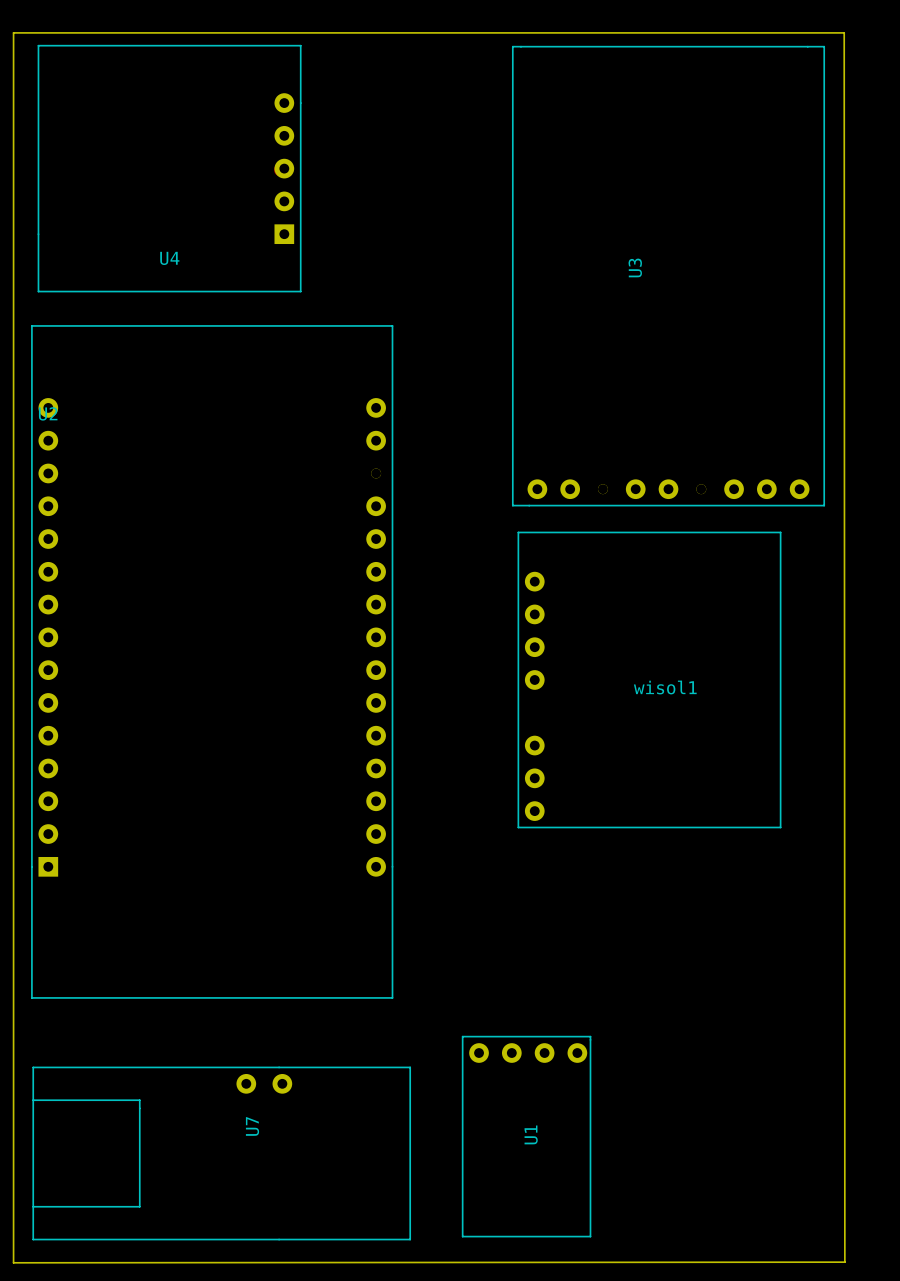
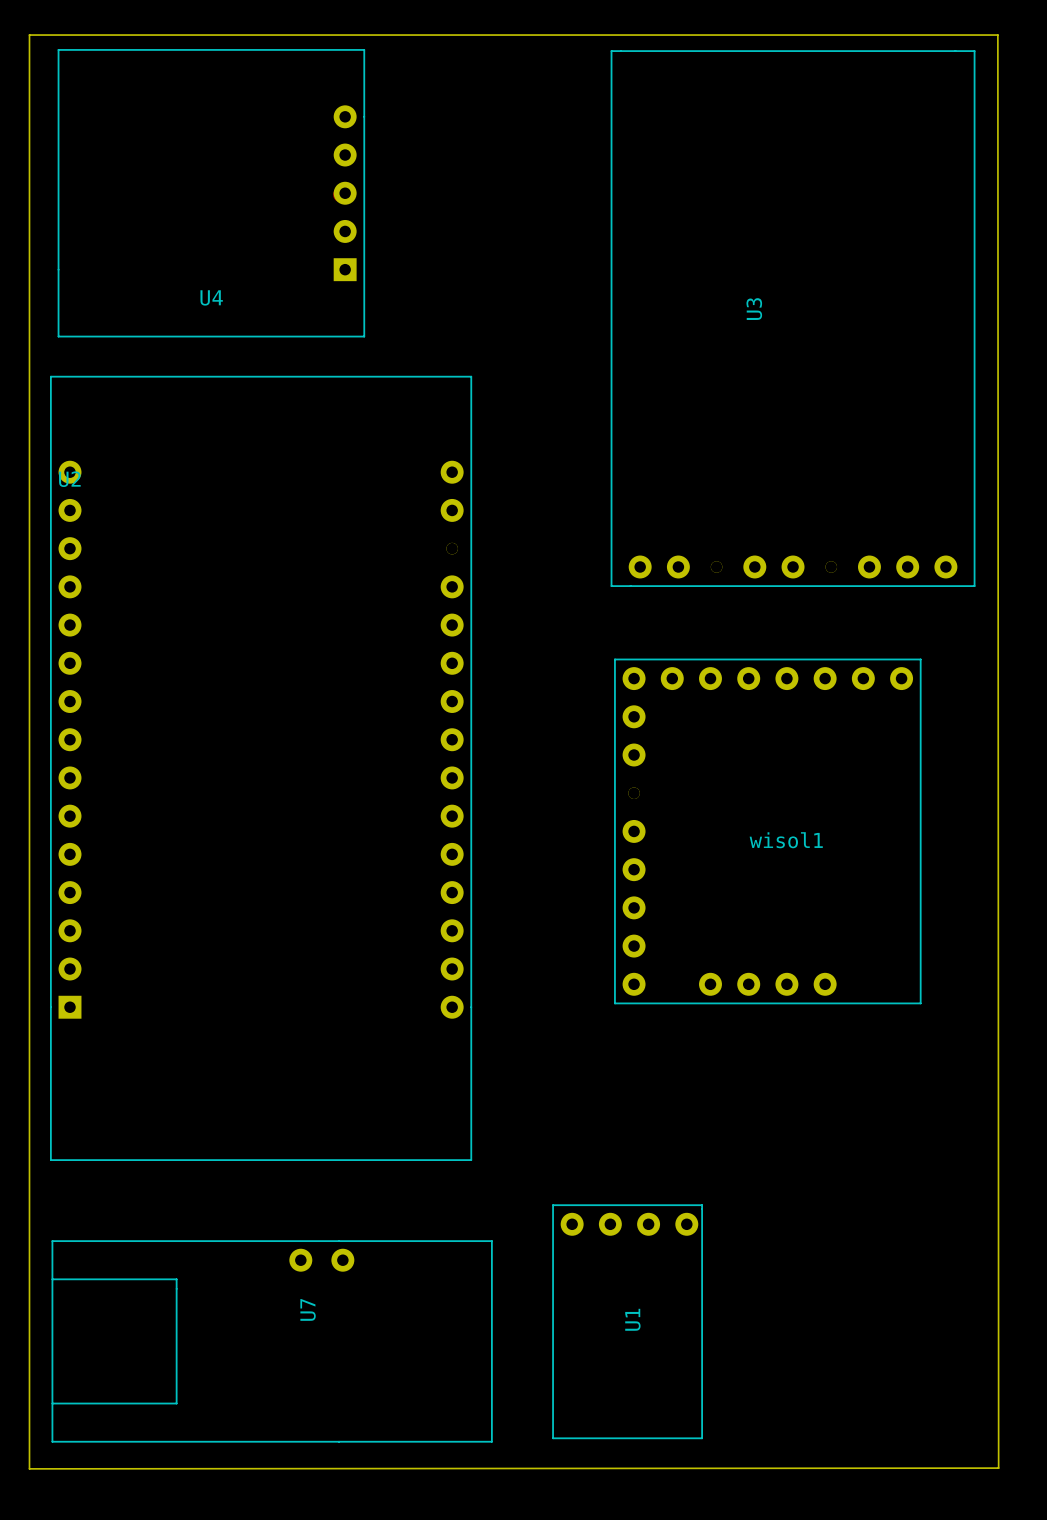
wisol1 footprint: [517, 531, 782, 829] -> [614, 658, 922, 1005]

